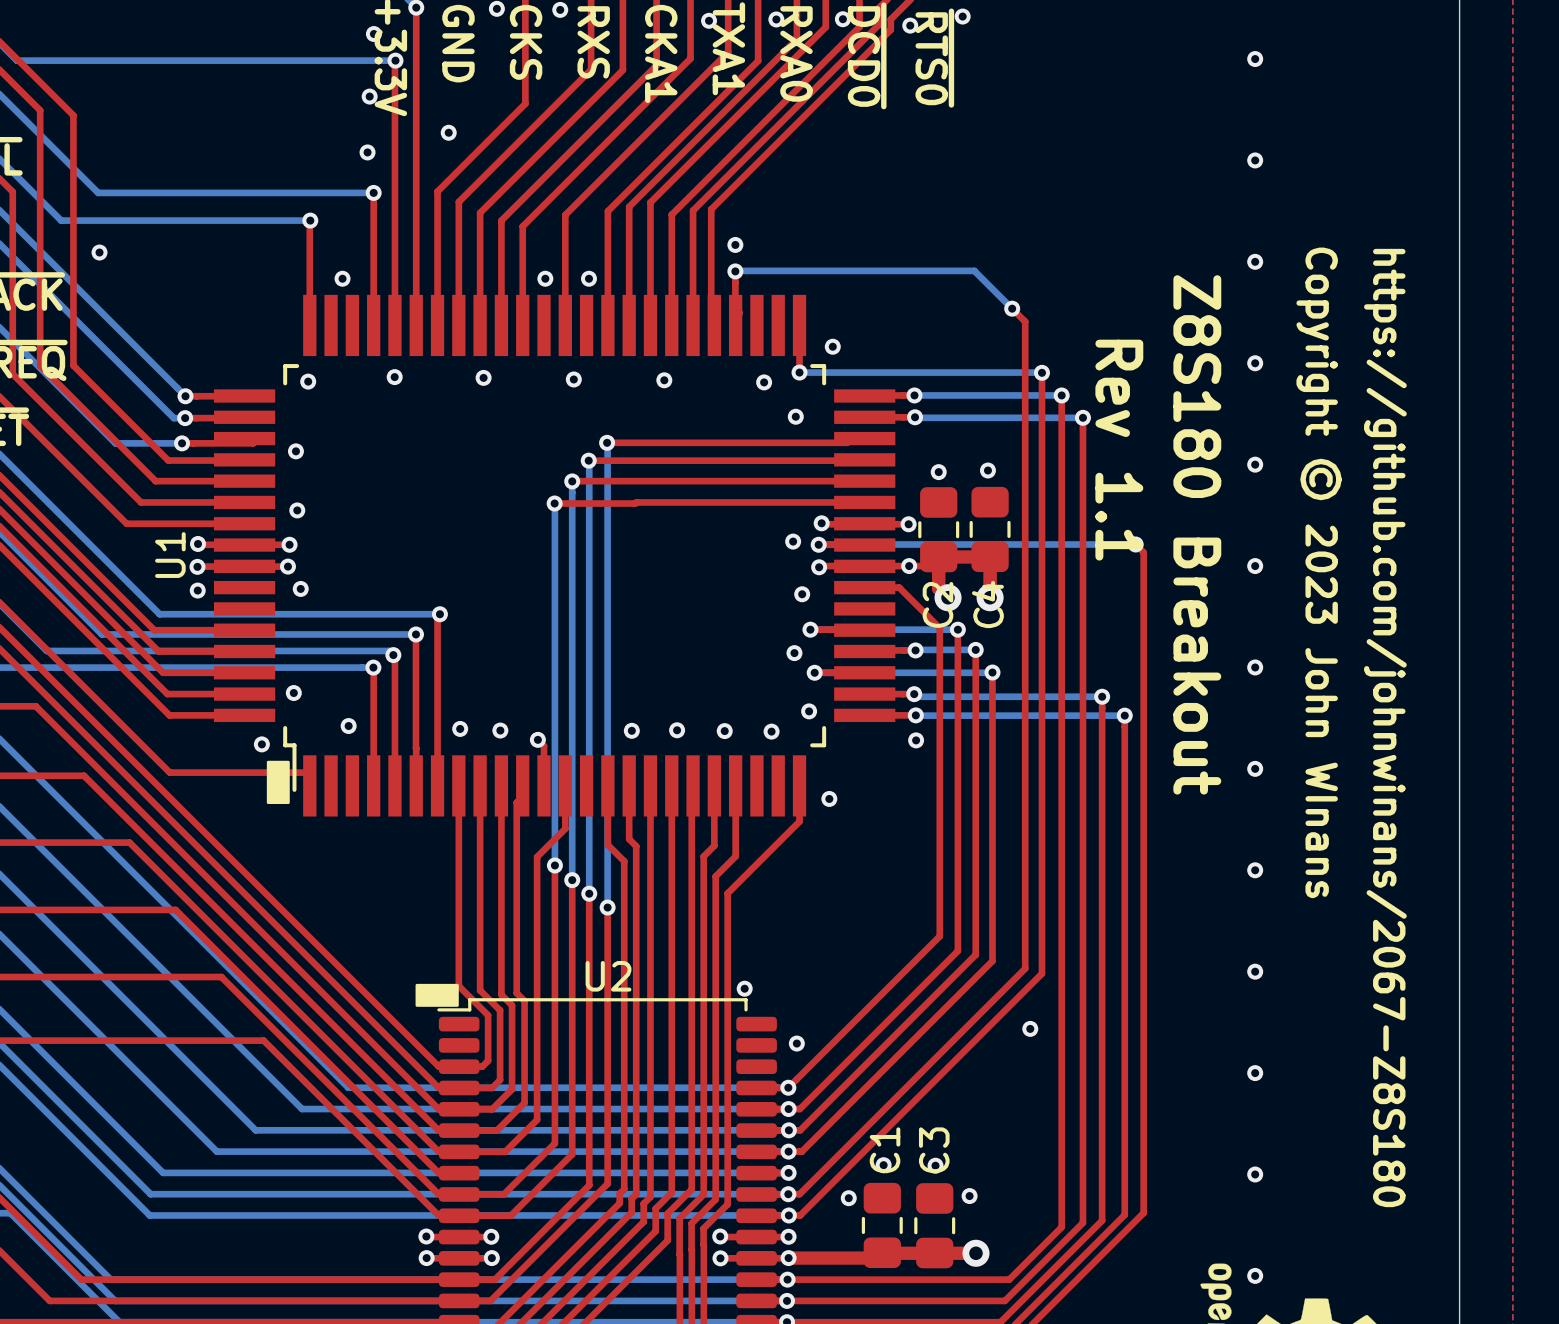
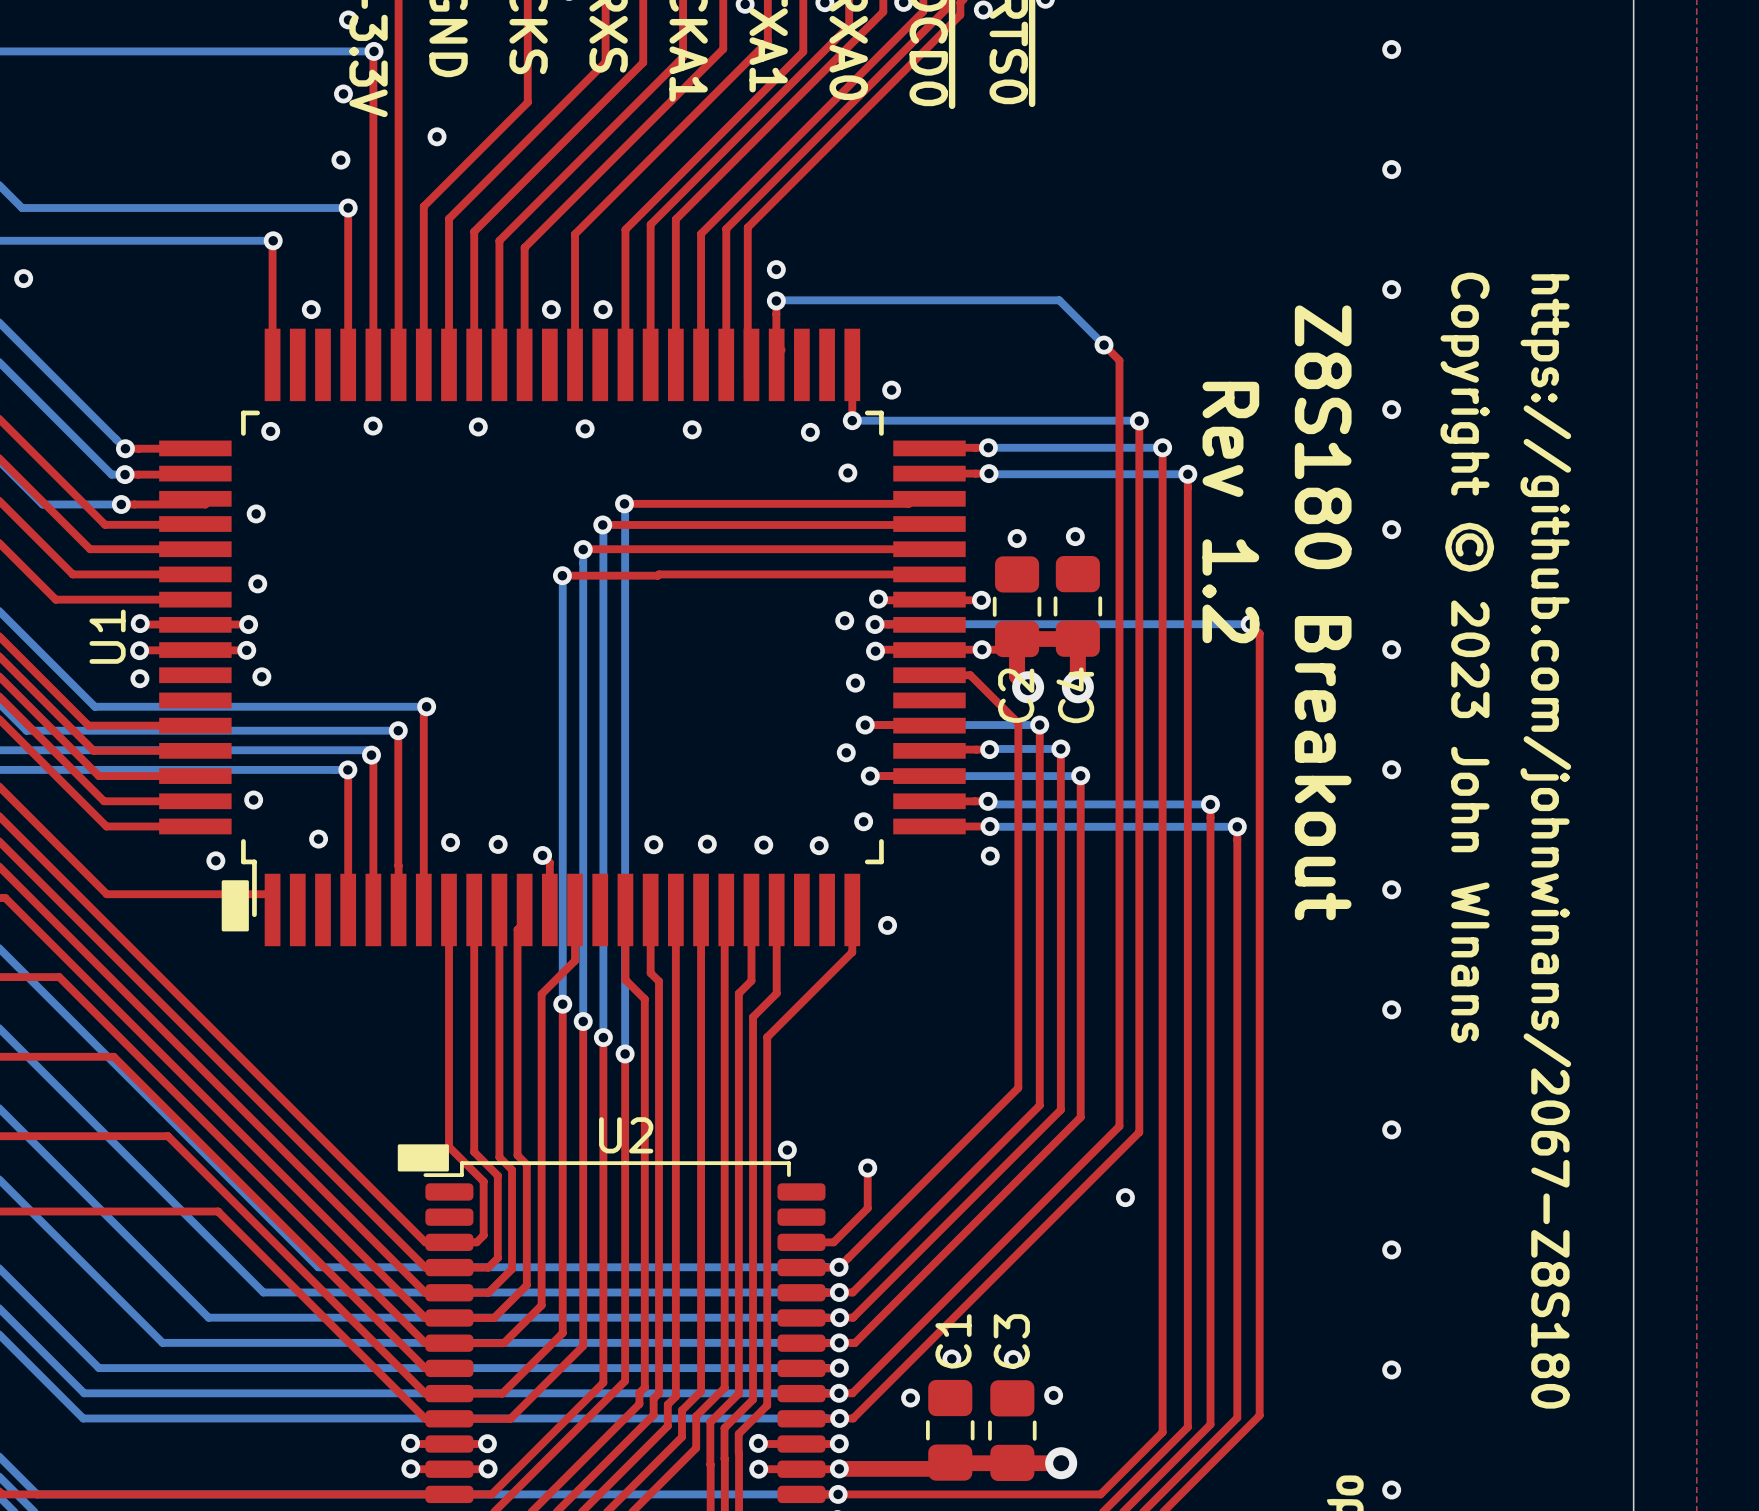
text: Rev 1.1 (1119, 450) -> Rev 1.2 (1230, 512)
top track: none -> (867, 1167) (867, 1208) (833, 1242) (801, 1242)
via position: (796, 1043) -> (867, 1168)

